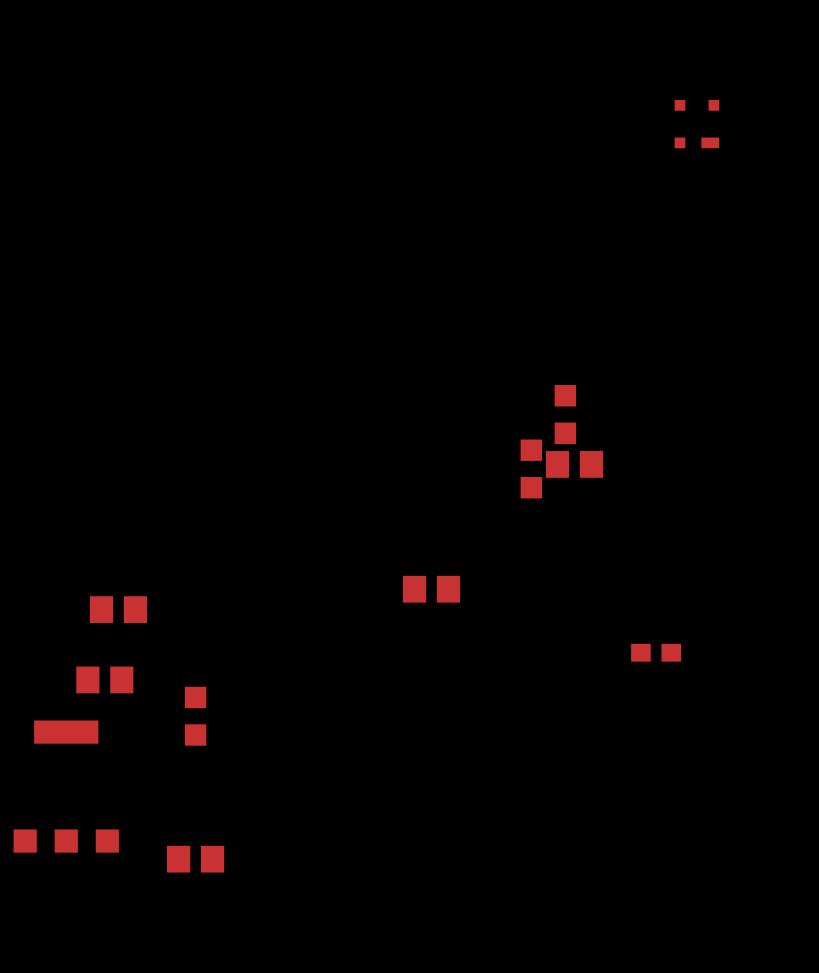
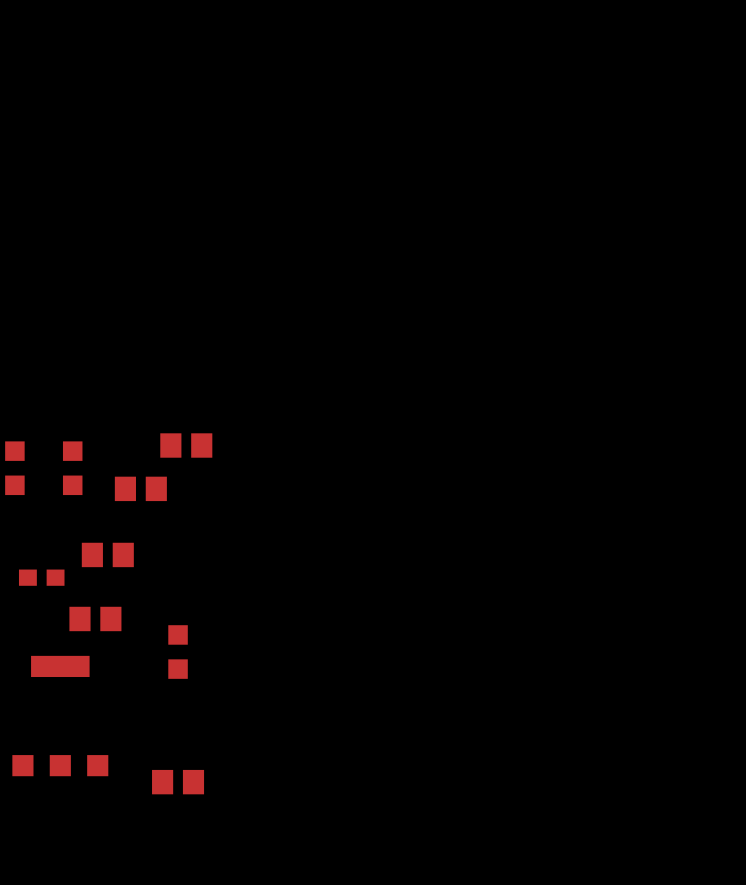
part: (696, 124) -> none
part: (565, 414) -> none
part: (574, 464) -> none
part: (531, 468) -> none
part: none -> (186, 445)
part: none -> (14, 468)
part: none -> (72, 468)
part: none -> (140, 488)
part: (431, 589) -> none
part: none -> (41, 577)
part: (656, 652) -> none

